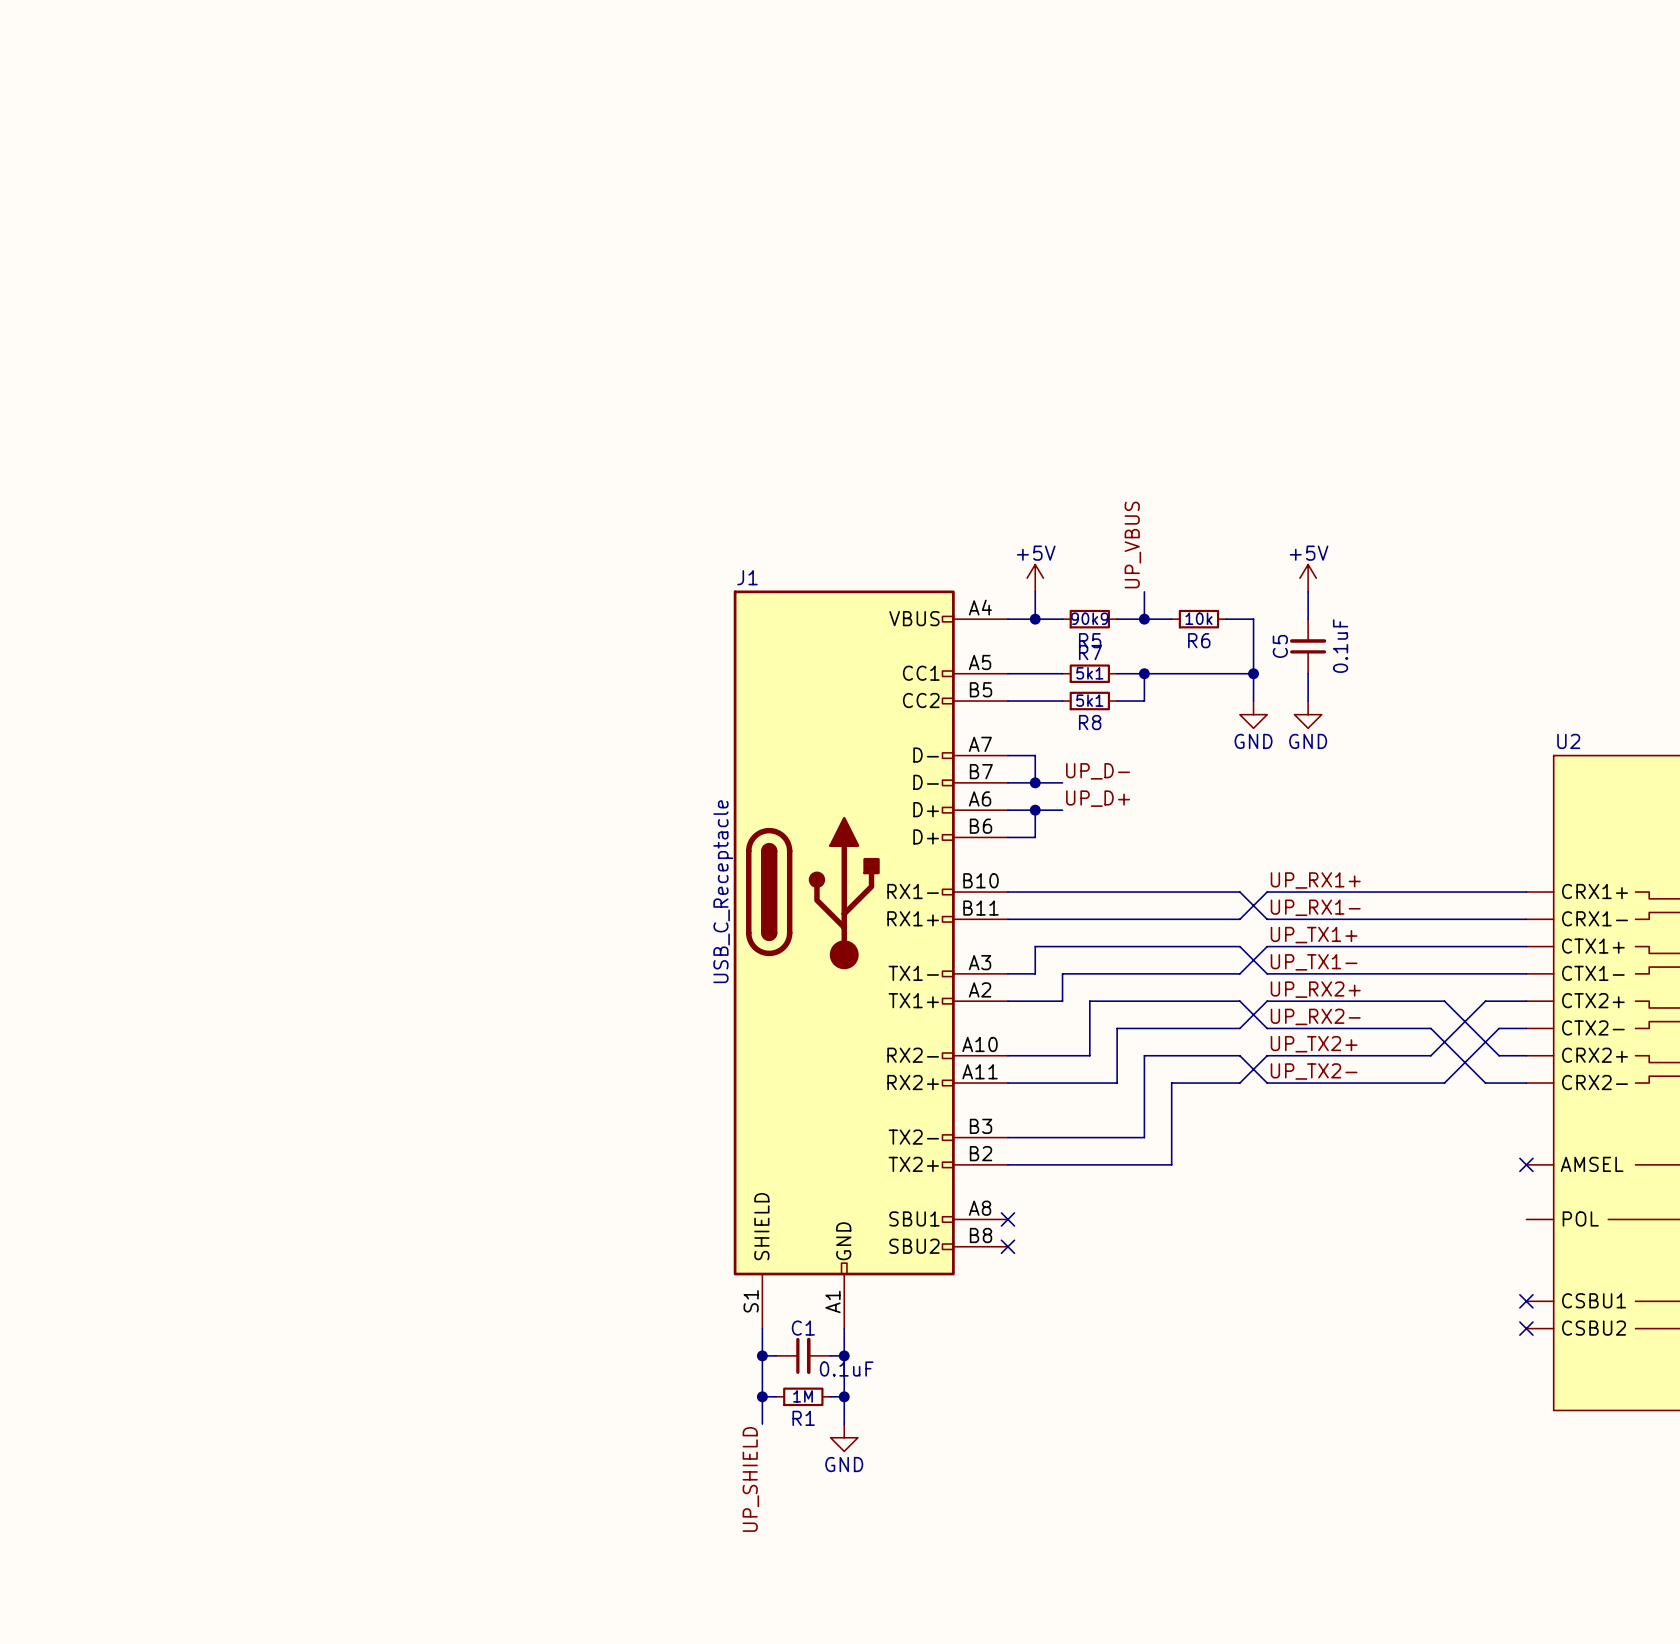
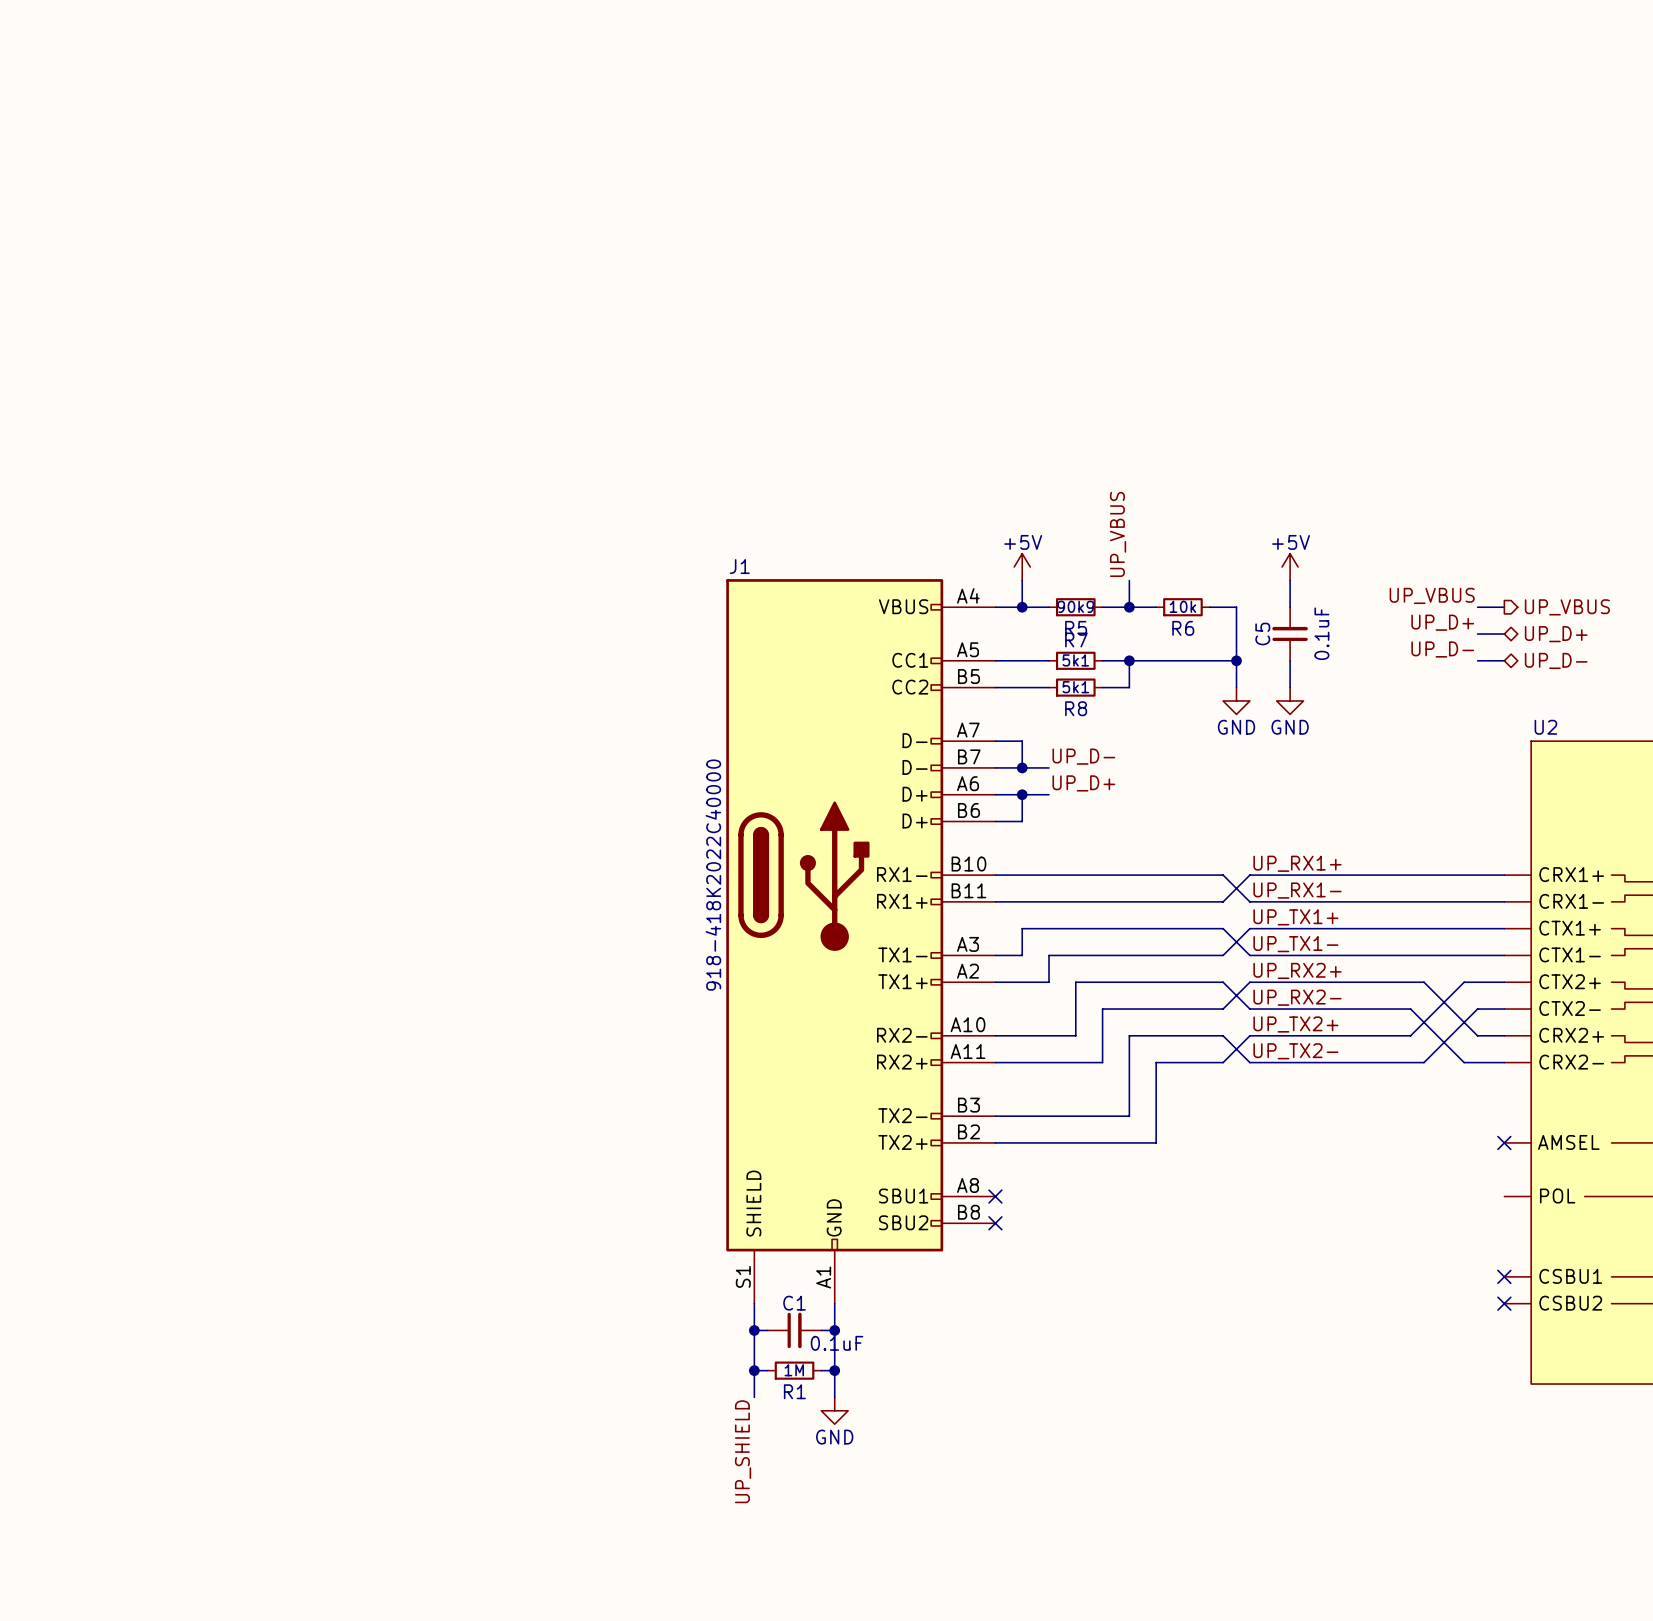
label: none -> UP_VBUS (1432, 595)
wire: none -> (1477, 607) (1504, 607)
hierarchical label: none -> UP_VBUS (1567, 607)
label: none -> UP_D+ (1442, 622)
wire: none -> (1477, 634) (1504, 634)
hierarchical label: none -> UP_D+ (1556, 634)
label: none -> UP_D- (1442, 649)
wire: none -> (1477, 660) (1504, 660)
hierarchical label: none -> UP_D- (1556, 660)
J1 value: USB_C_Receptacle (723, 891) -> 918-418K2022C40000 (713, 875)

